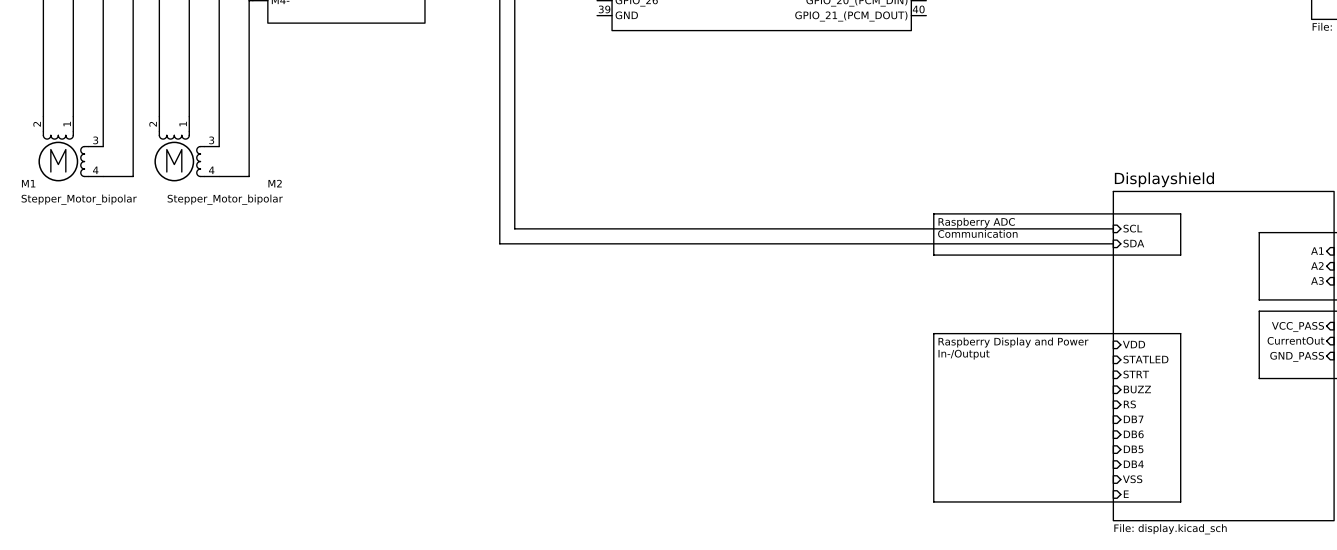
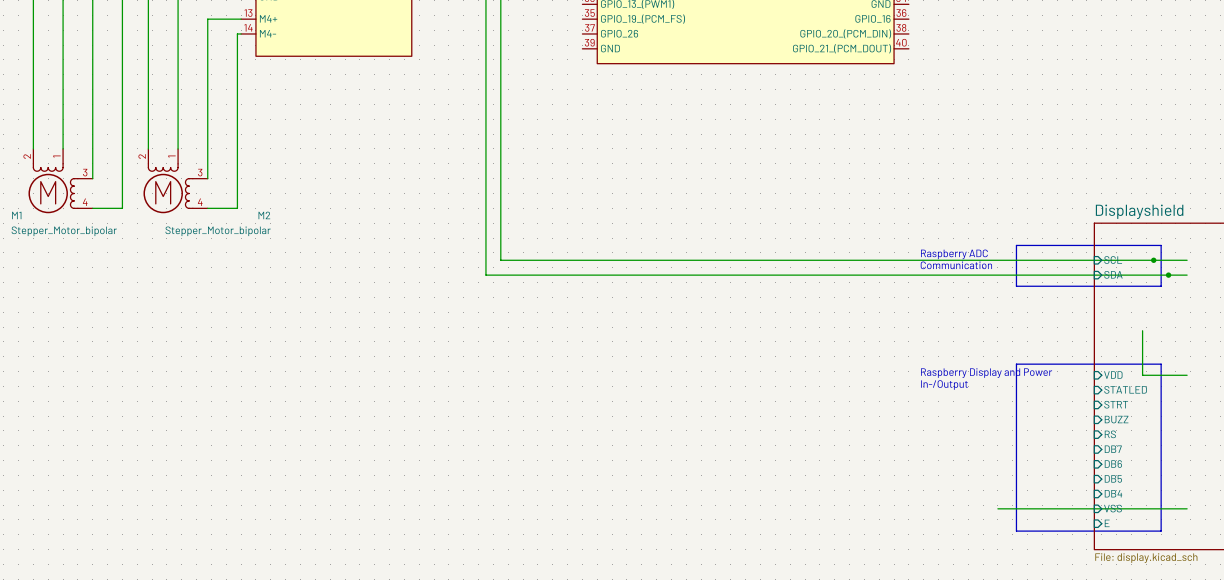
line: (1034, 213) (933, 213) (933, 255) (1034, 255) -> (1016, 245) (1016, 286)
wire: none -> (1094, 260) (1187, 260)
junction: none -> (1153, 260)
wire: none -> (1094, 275) (1187, 275)
junction: none -> (1168, 275)
wire: none -> (1142, 330) (1142, 375) (1187, 375)
line: (1034, 333) (933, 333) (933, 501) (1034, 501) -> (1016, 364) (1016, 531)
wire: none -> (997, 508) (1187, 508)

